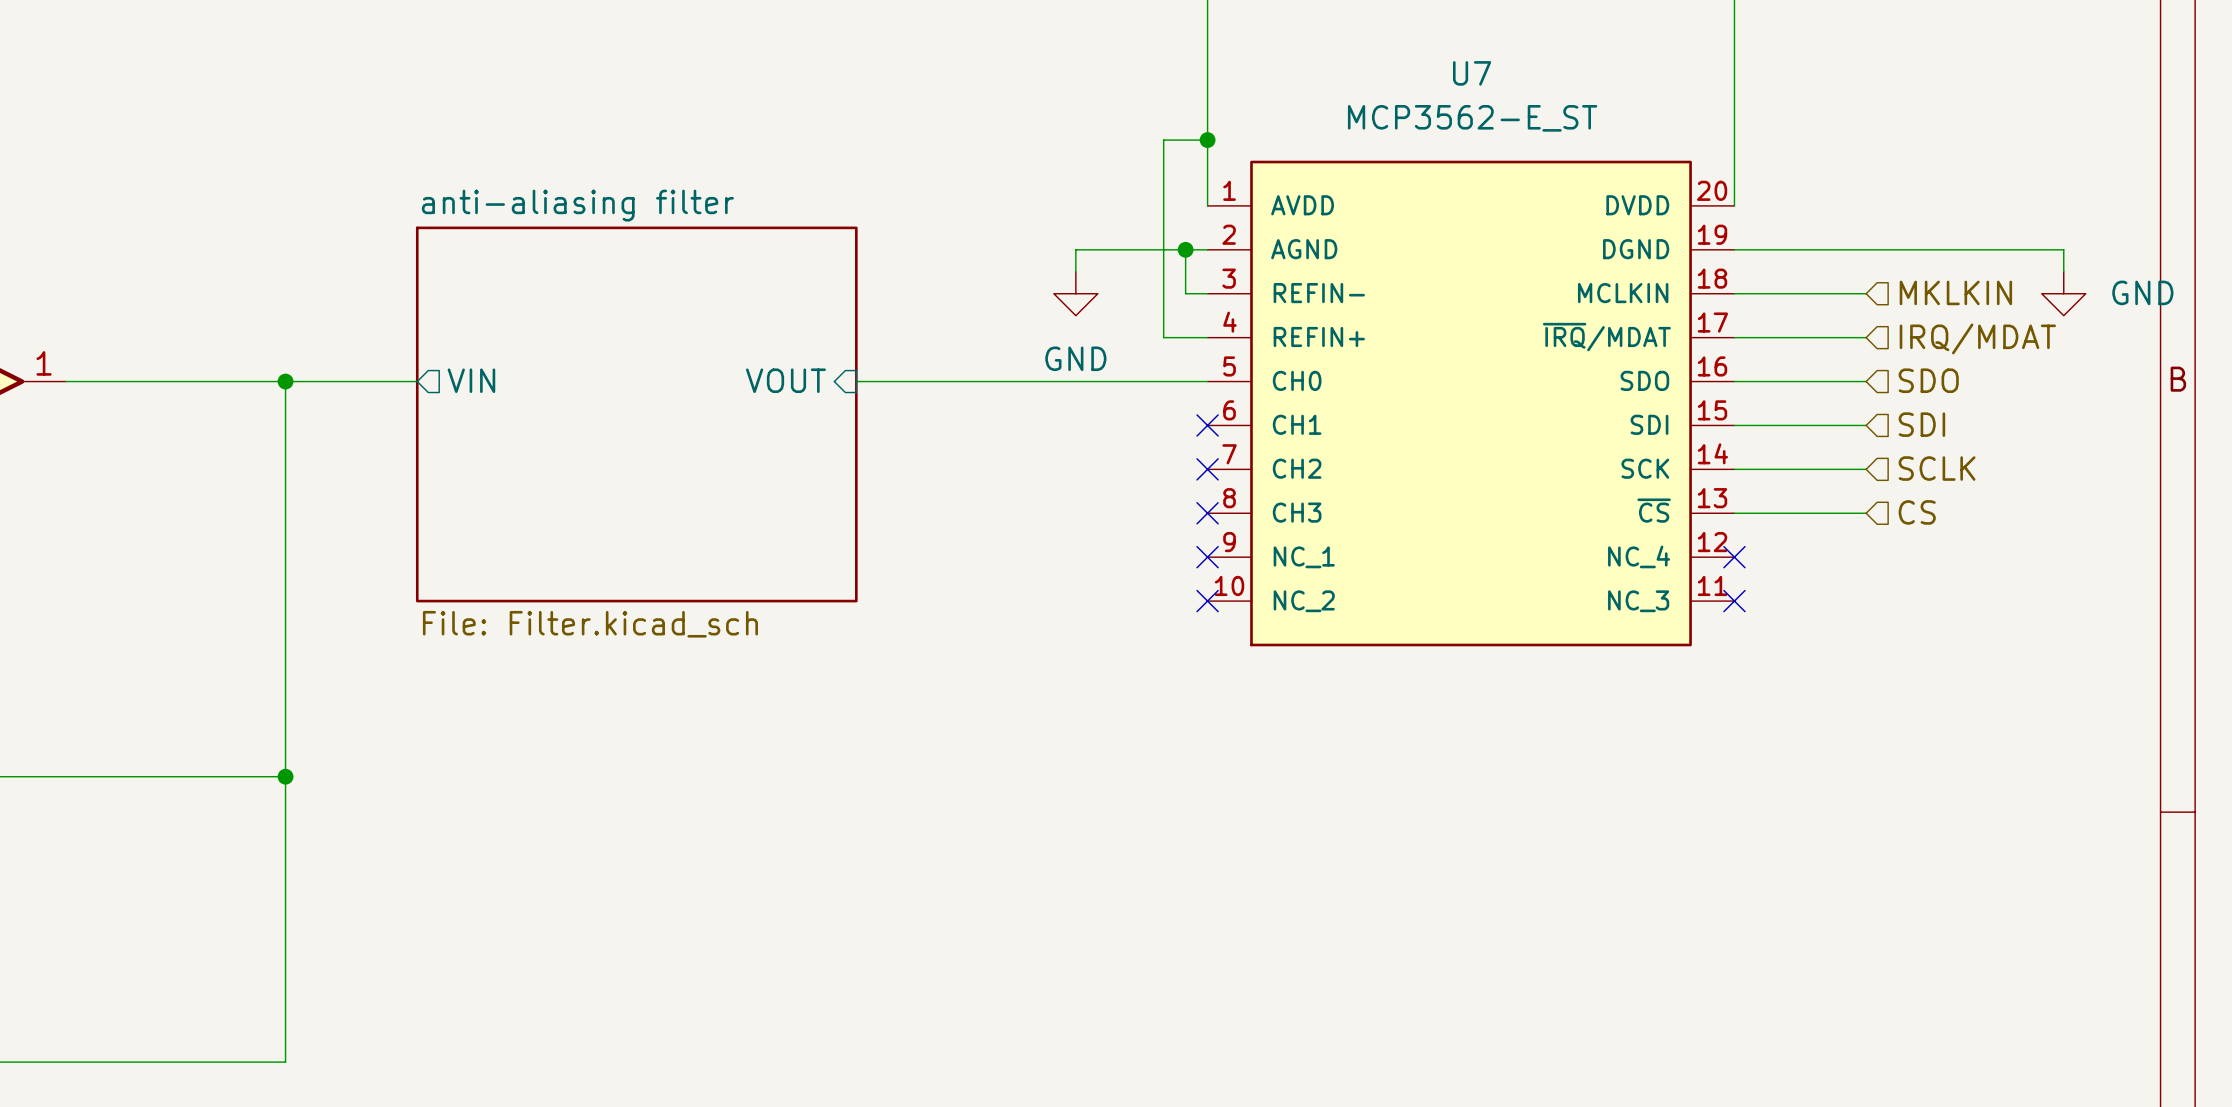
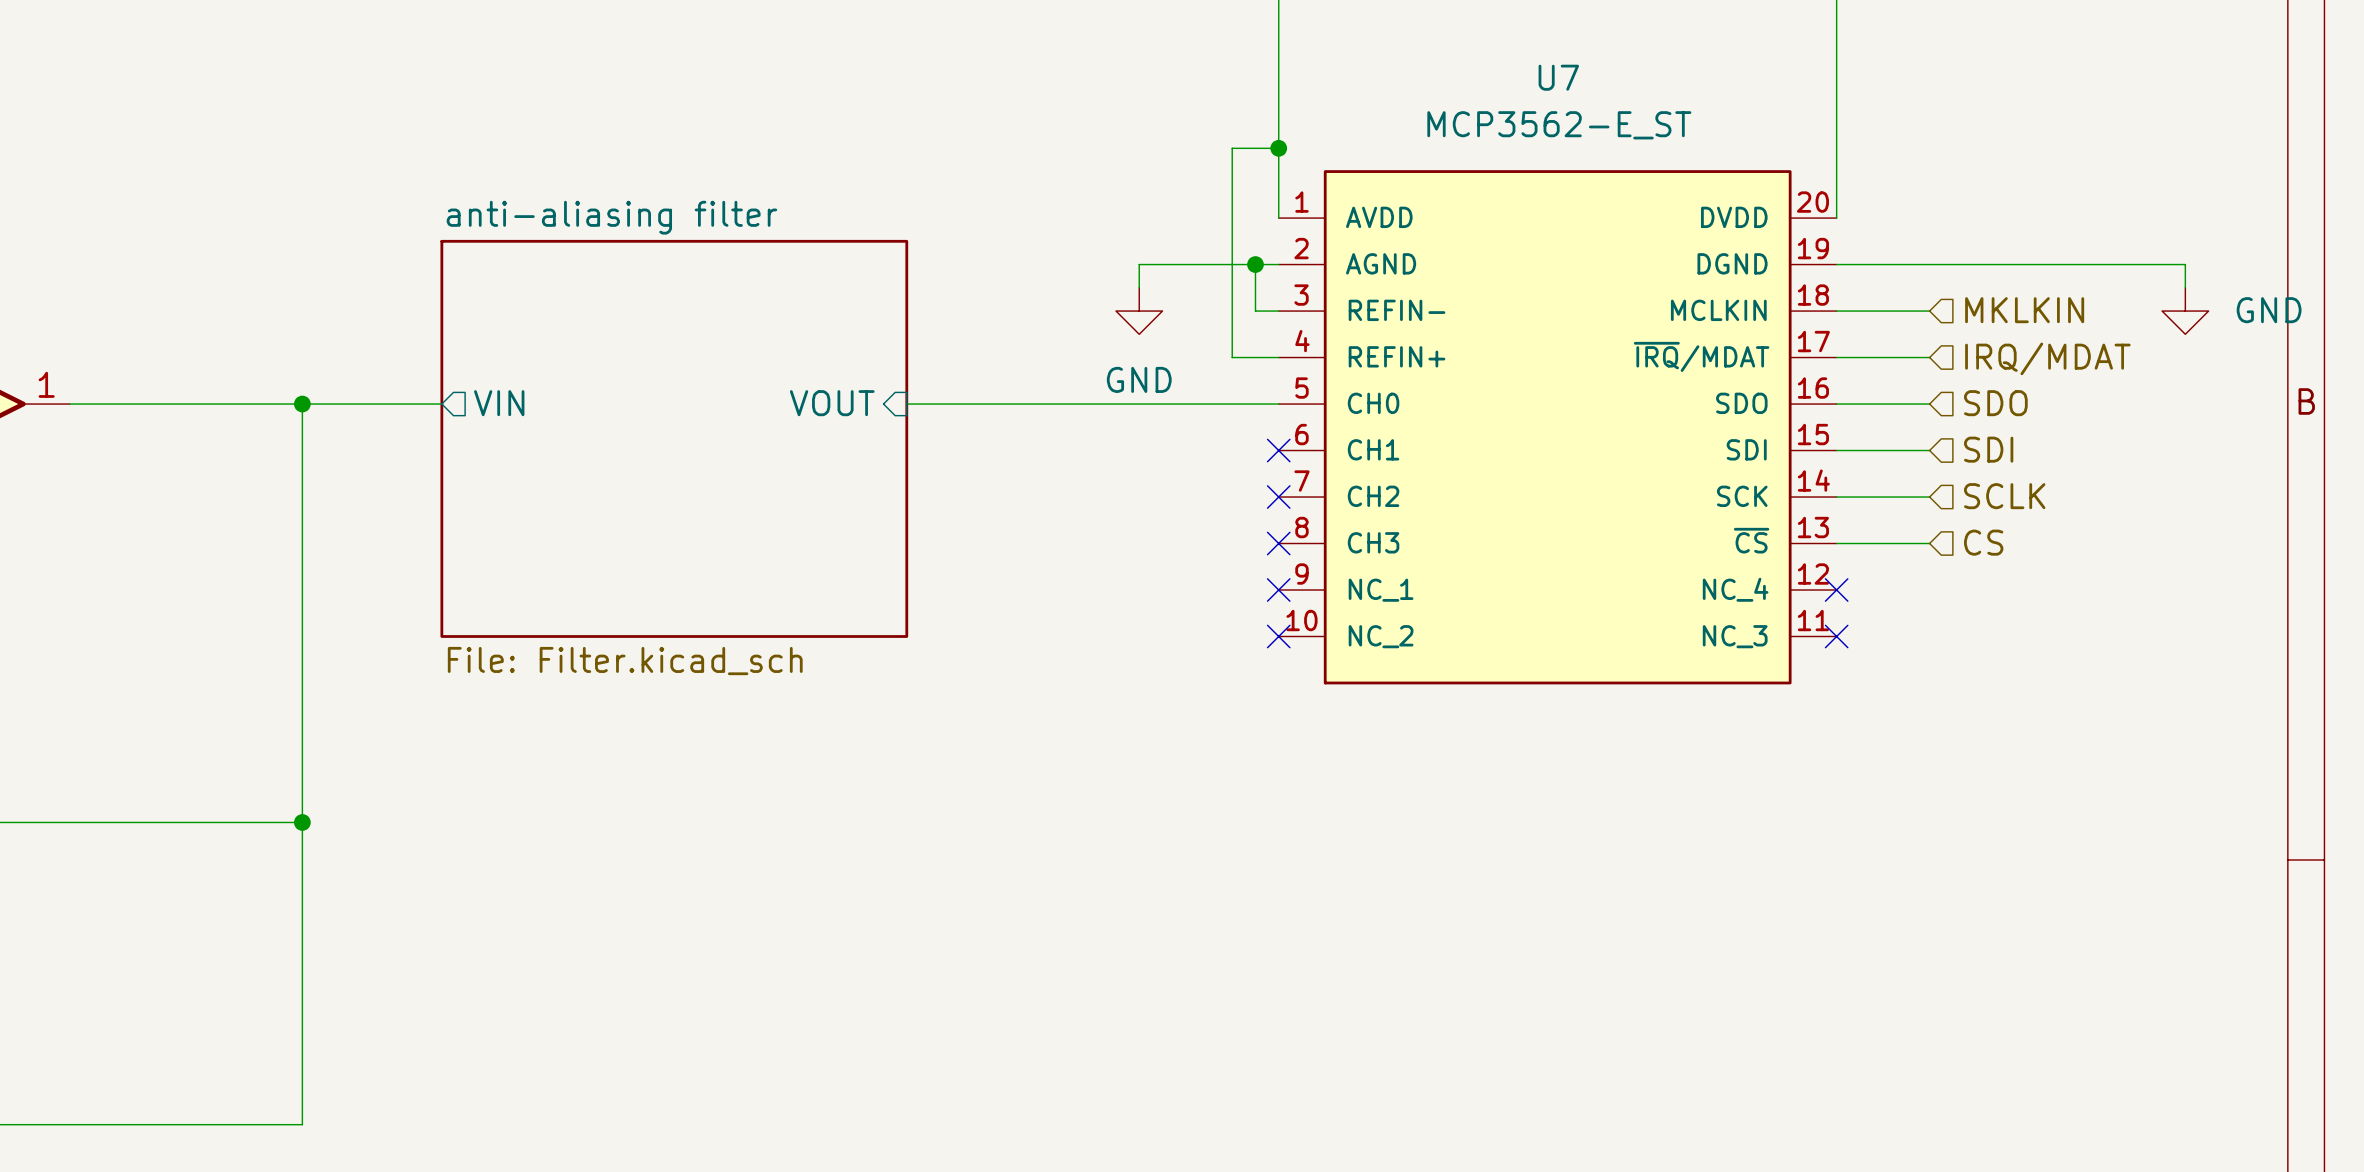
hierarchical label position: MKLKIN (1955, 292) -> MKLKIN (2024, 310)
wire: (1822, 293) (1866, 293) -> none
wire: (1822, 337) (1866, 337) -> none
hierarchical label position: IRQ/MDAT (1977, 338) -> IRQ/MDAT (2047, 358)
hierarchical label position: SDO (1928, 380) -> SDO (1995, 403)
wire: (1822, 381) (1866, 381) -> none
hierarchical label position: SDI (1921, 424) -> SDI (1988, 449)
wire: (1822, 425) (1866, 425) -> none
hierarchical label position: SCLK (1937, 468) -> SCLK (2004, 496)
wire: (1822, 469) (1866, 469) -> none
hierarchical label position: CS (1917, 512) -> CS (1983, 542)
wire: (1822, 513) (1866, 513) -> none

